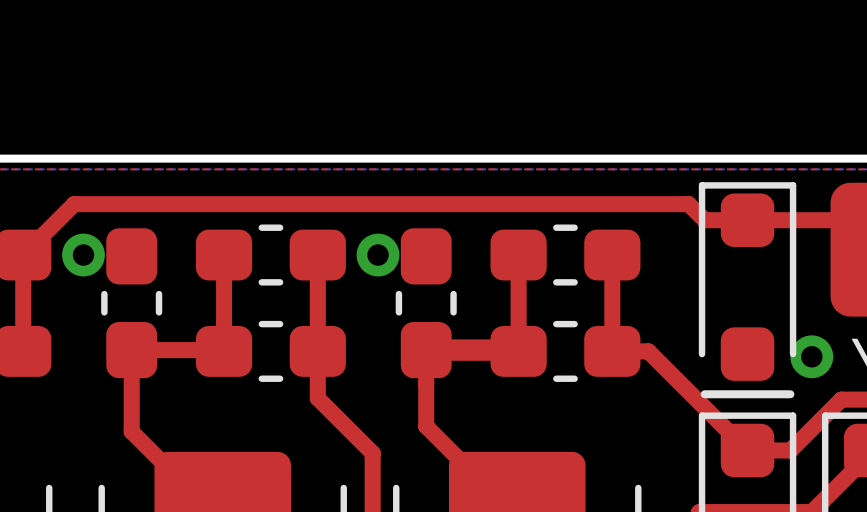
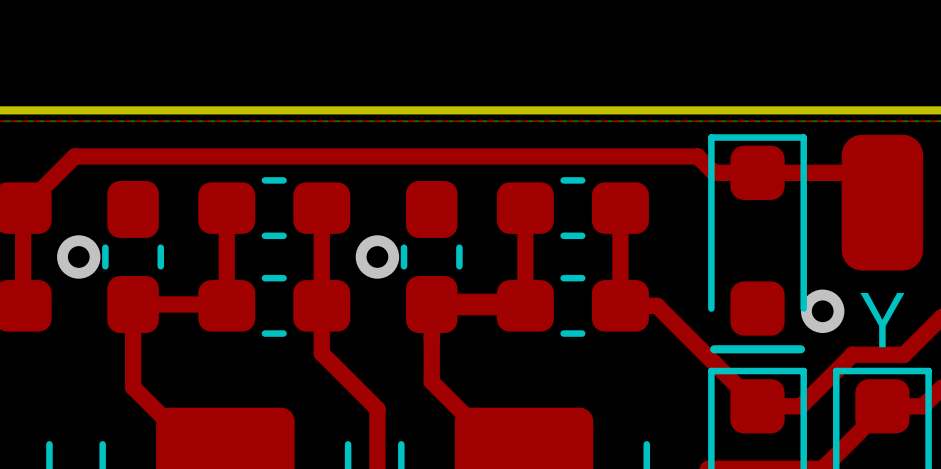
via position: (83, 255) -> (78, 256)
via position: (378, 255) -> (377, 256)

